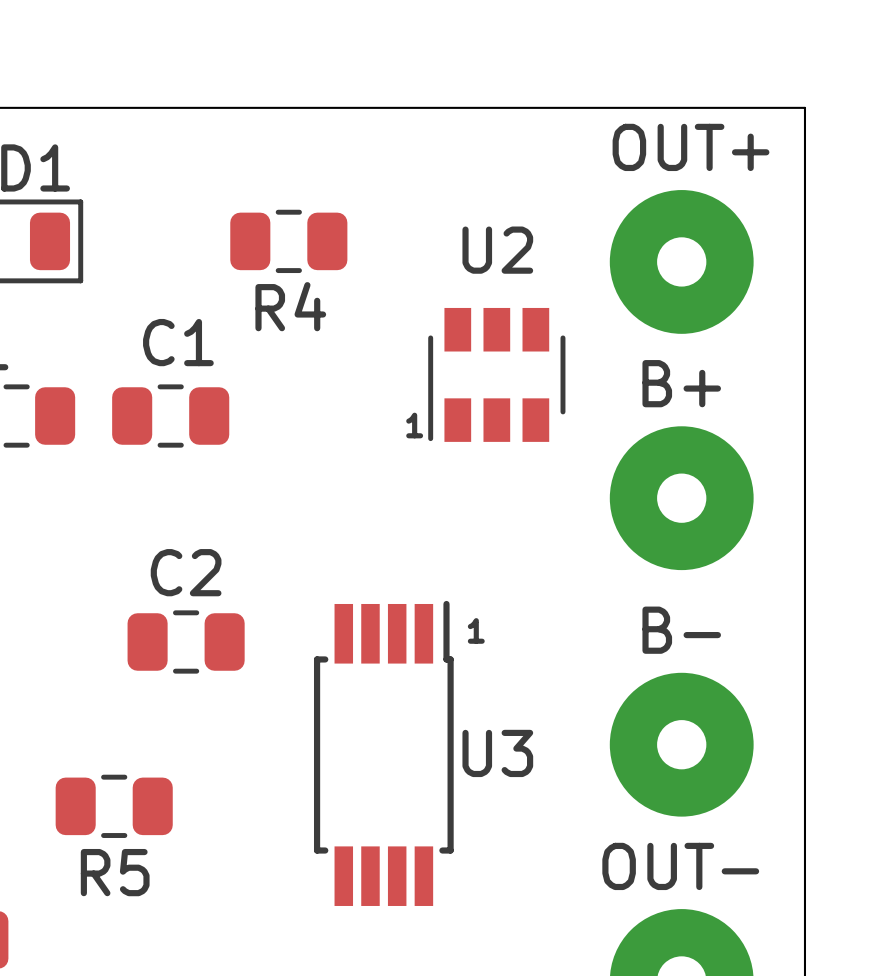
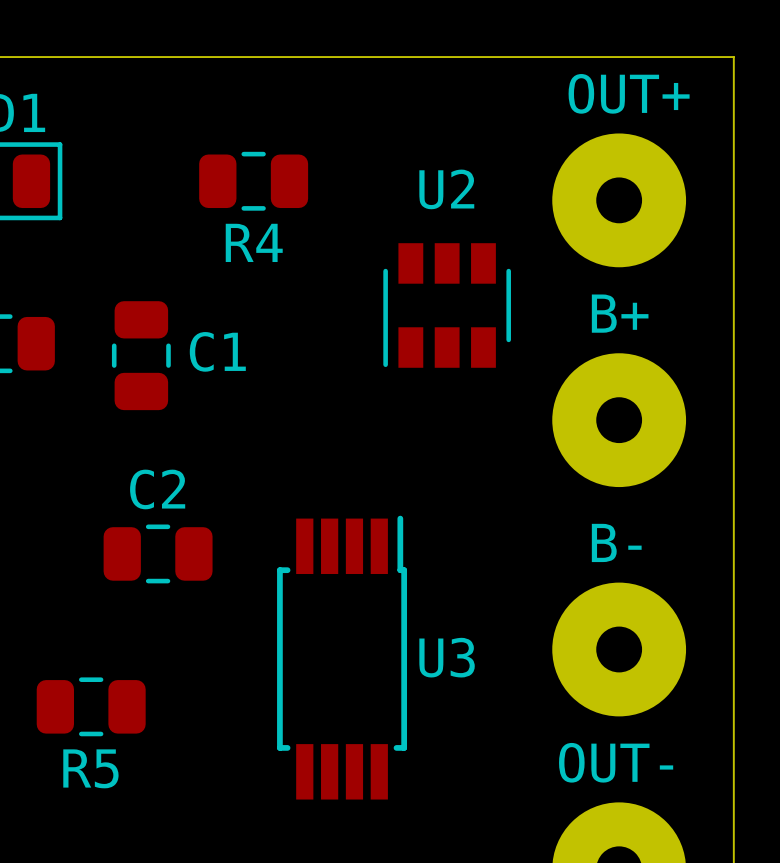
C1 rotation: 0° (170, 416) -> 90° clockwise (141, 355)
text: 1 (414, 425) -> none
text: 1 (476, 630) -> none

